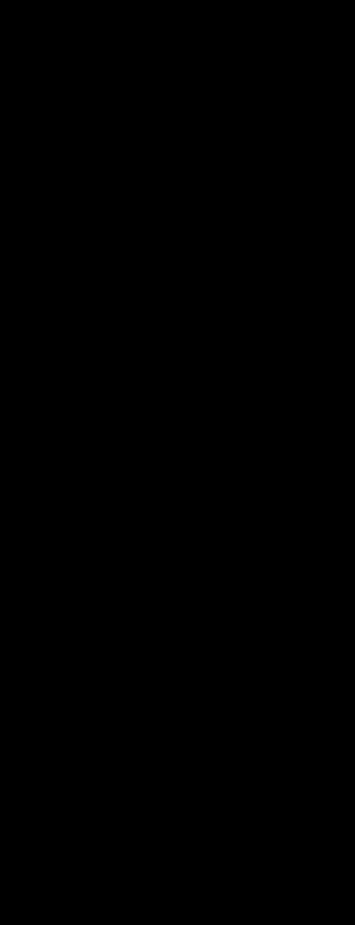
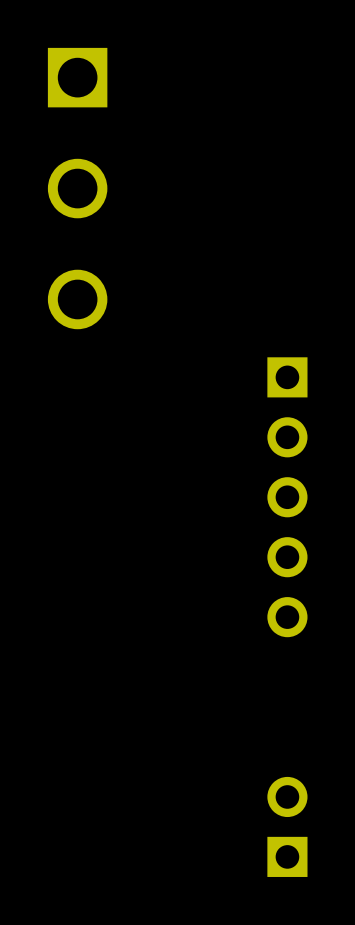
part: none -> (77, 188)
part: none -> (287, 497)
part: none -> (287, 826)

